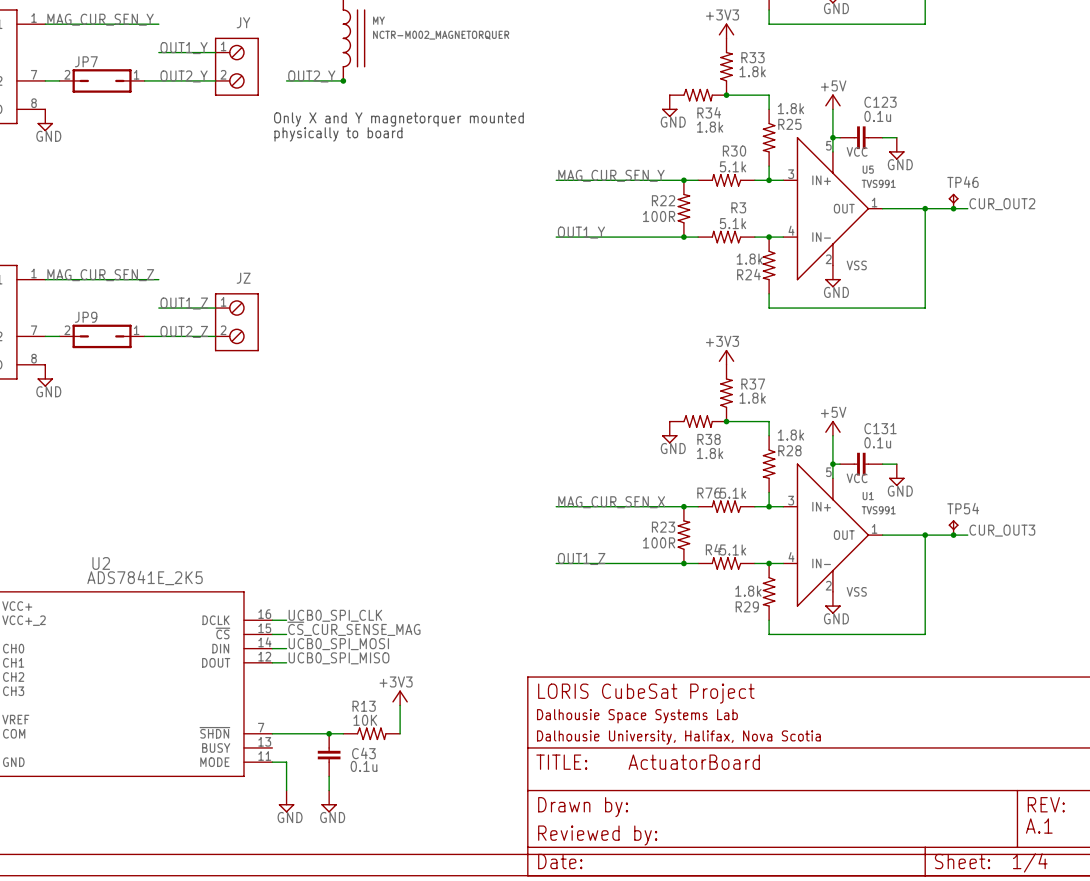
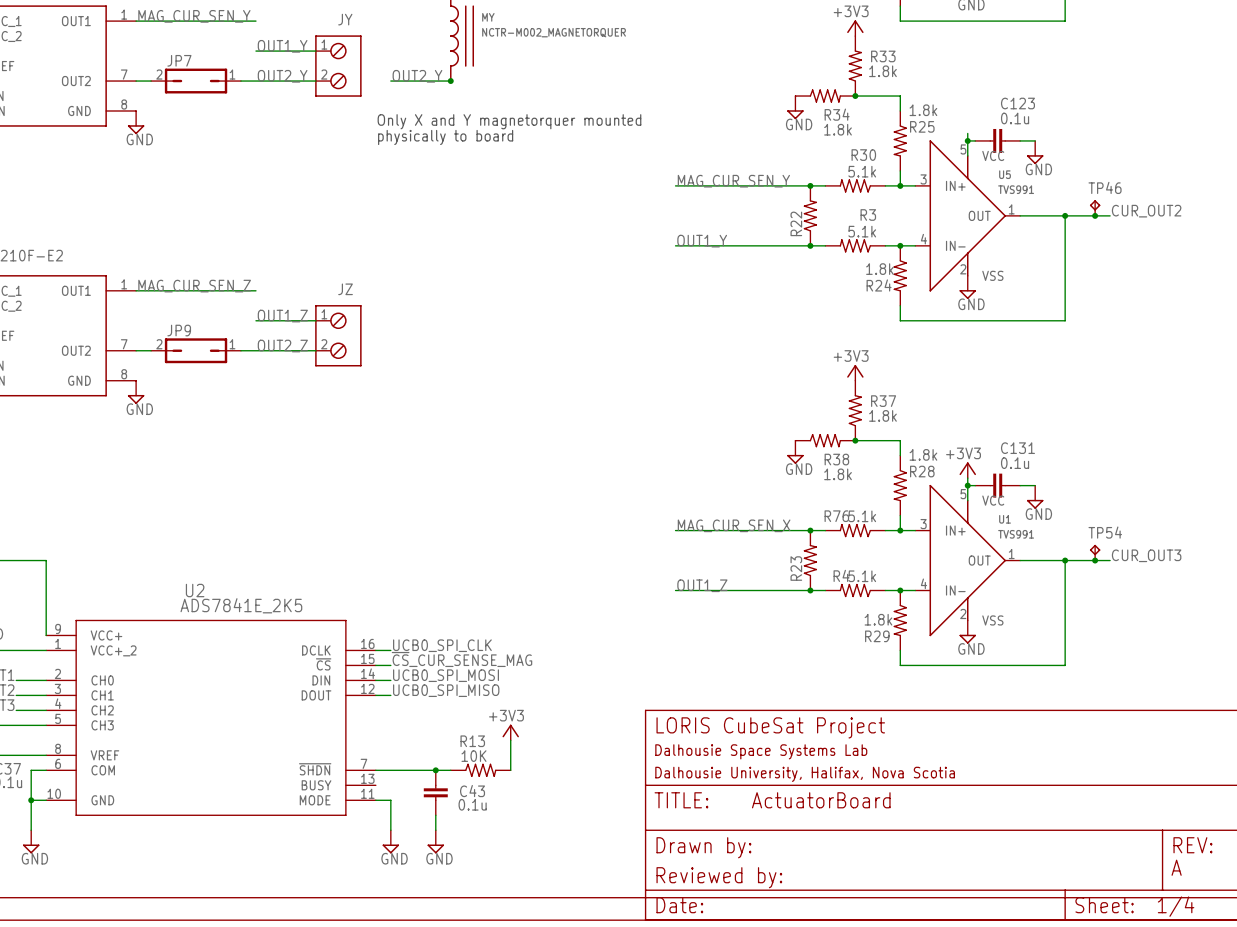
power symbol: +5V (832, 101) -> none
wire: (832, 109) (832, 130) -> none
R22 name rotation: 0° (663, 200) -> 90° counterclockwise (796, 223)
R22 value: 100R (659, 216) -> none
power symbol: +5V (832, 428) -> none
power symbol: none -> +3V3 (967, 470)
R23 name rotation: 0° (663, 527) -> 90° counterclockwise (796, 568)
R23 value: 100R (659, 542) -> none
text: A.1 (1039, 826) -> A (1176, 867)

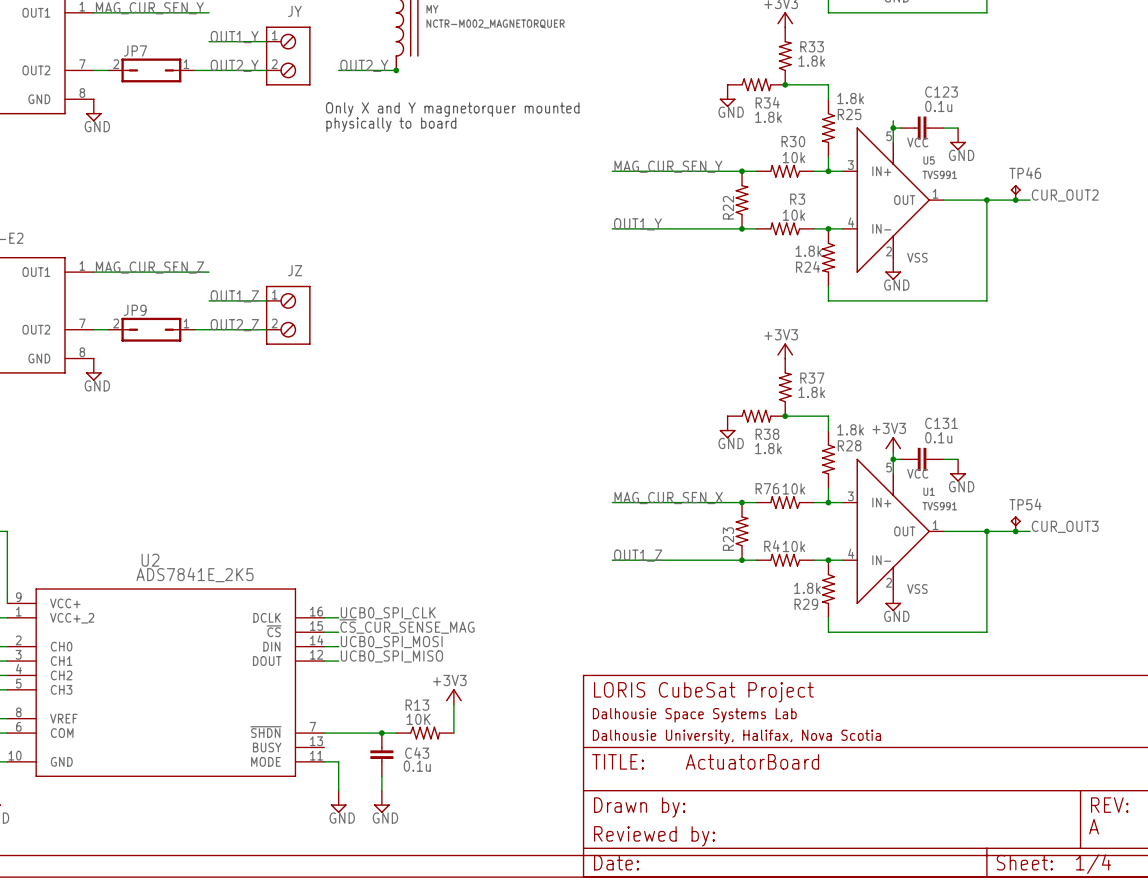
R30 value: 5.1k (862, 171) -> 10k (793, 157)
R3 value: 5.1k (862, 231) -> 10k (793, 215)
R76 value: 5.1k (862, 516) -> 10k (793, 488)
R4 value: 5.1k (862, 576) -> 10k (793, 546)

